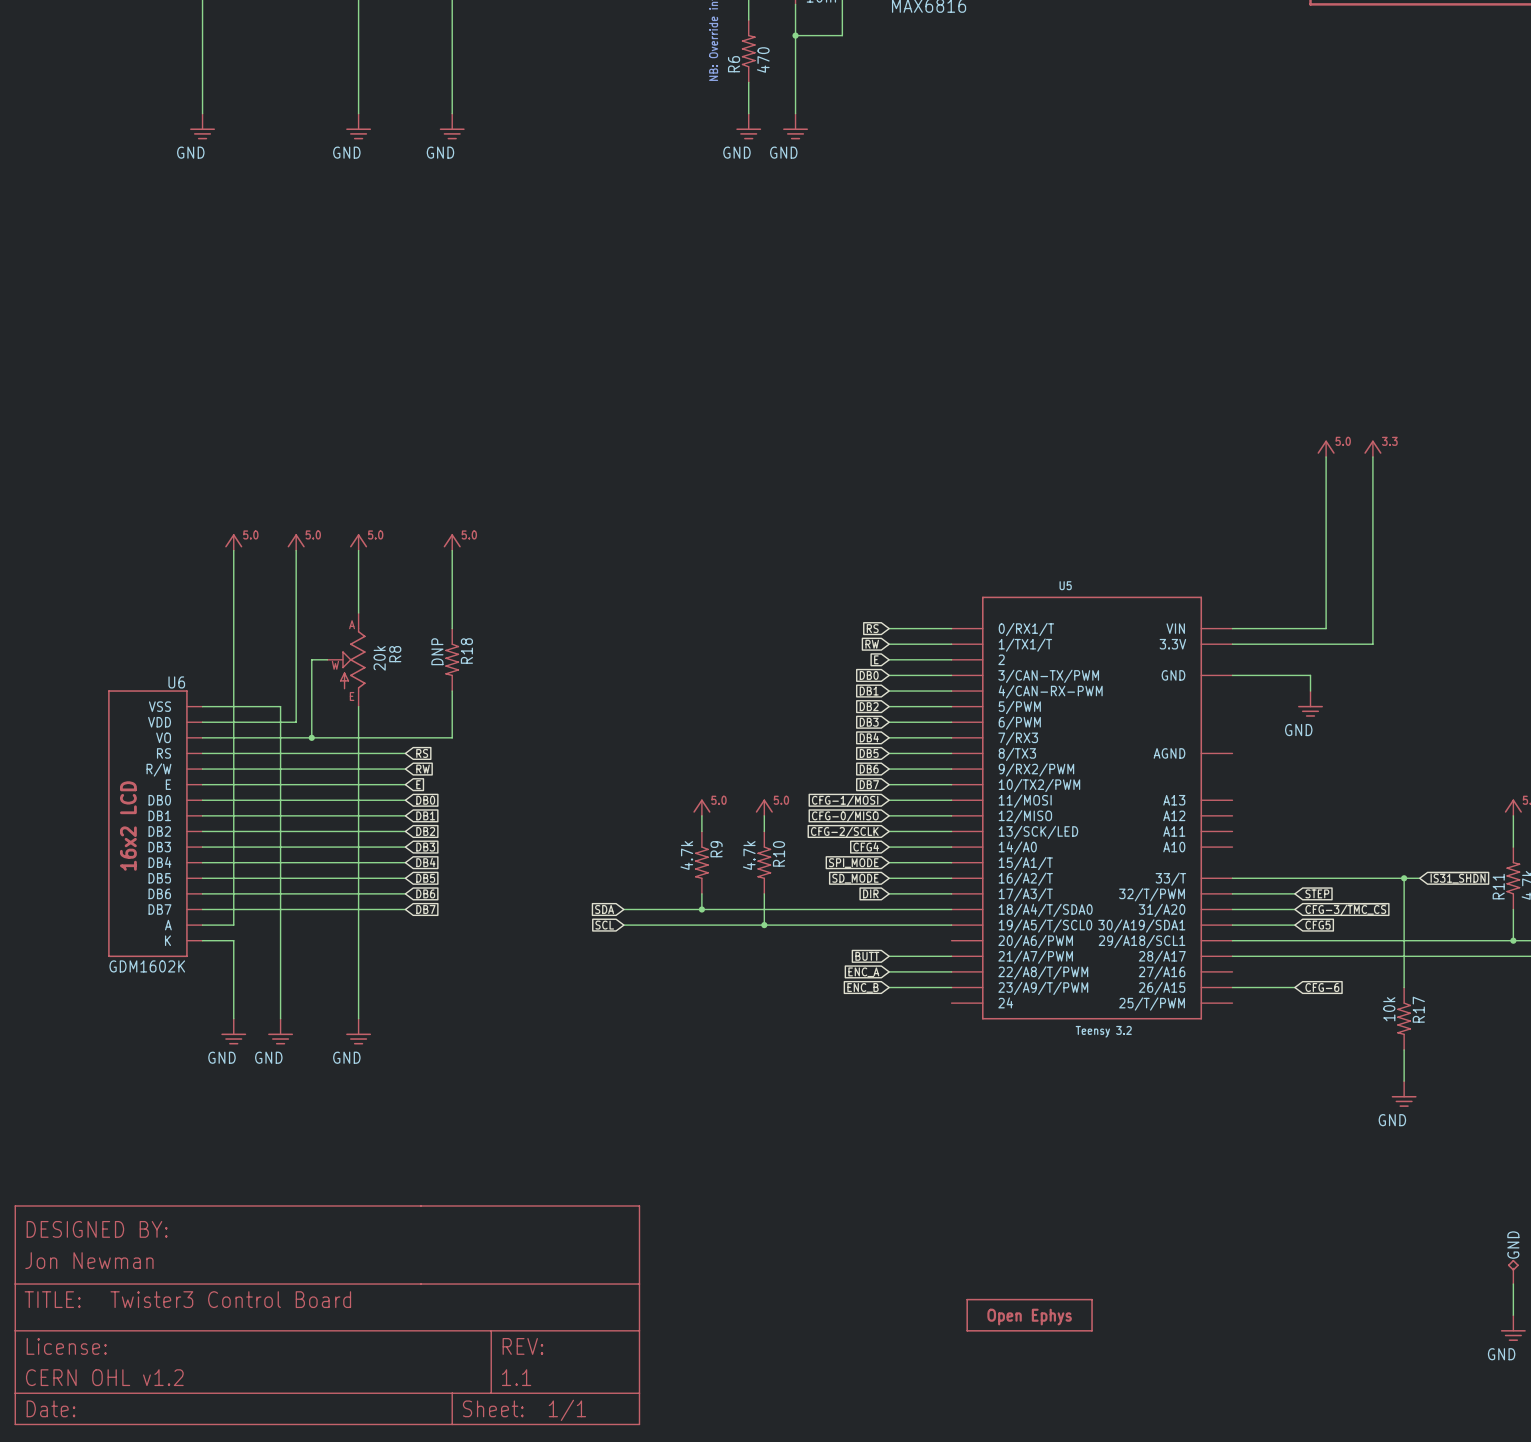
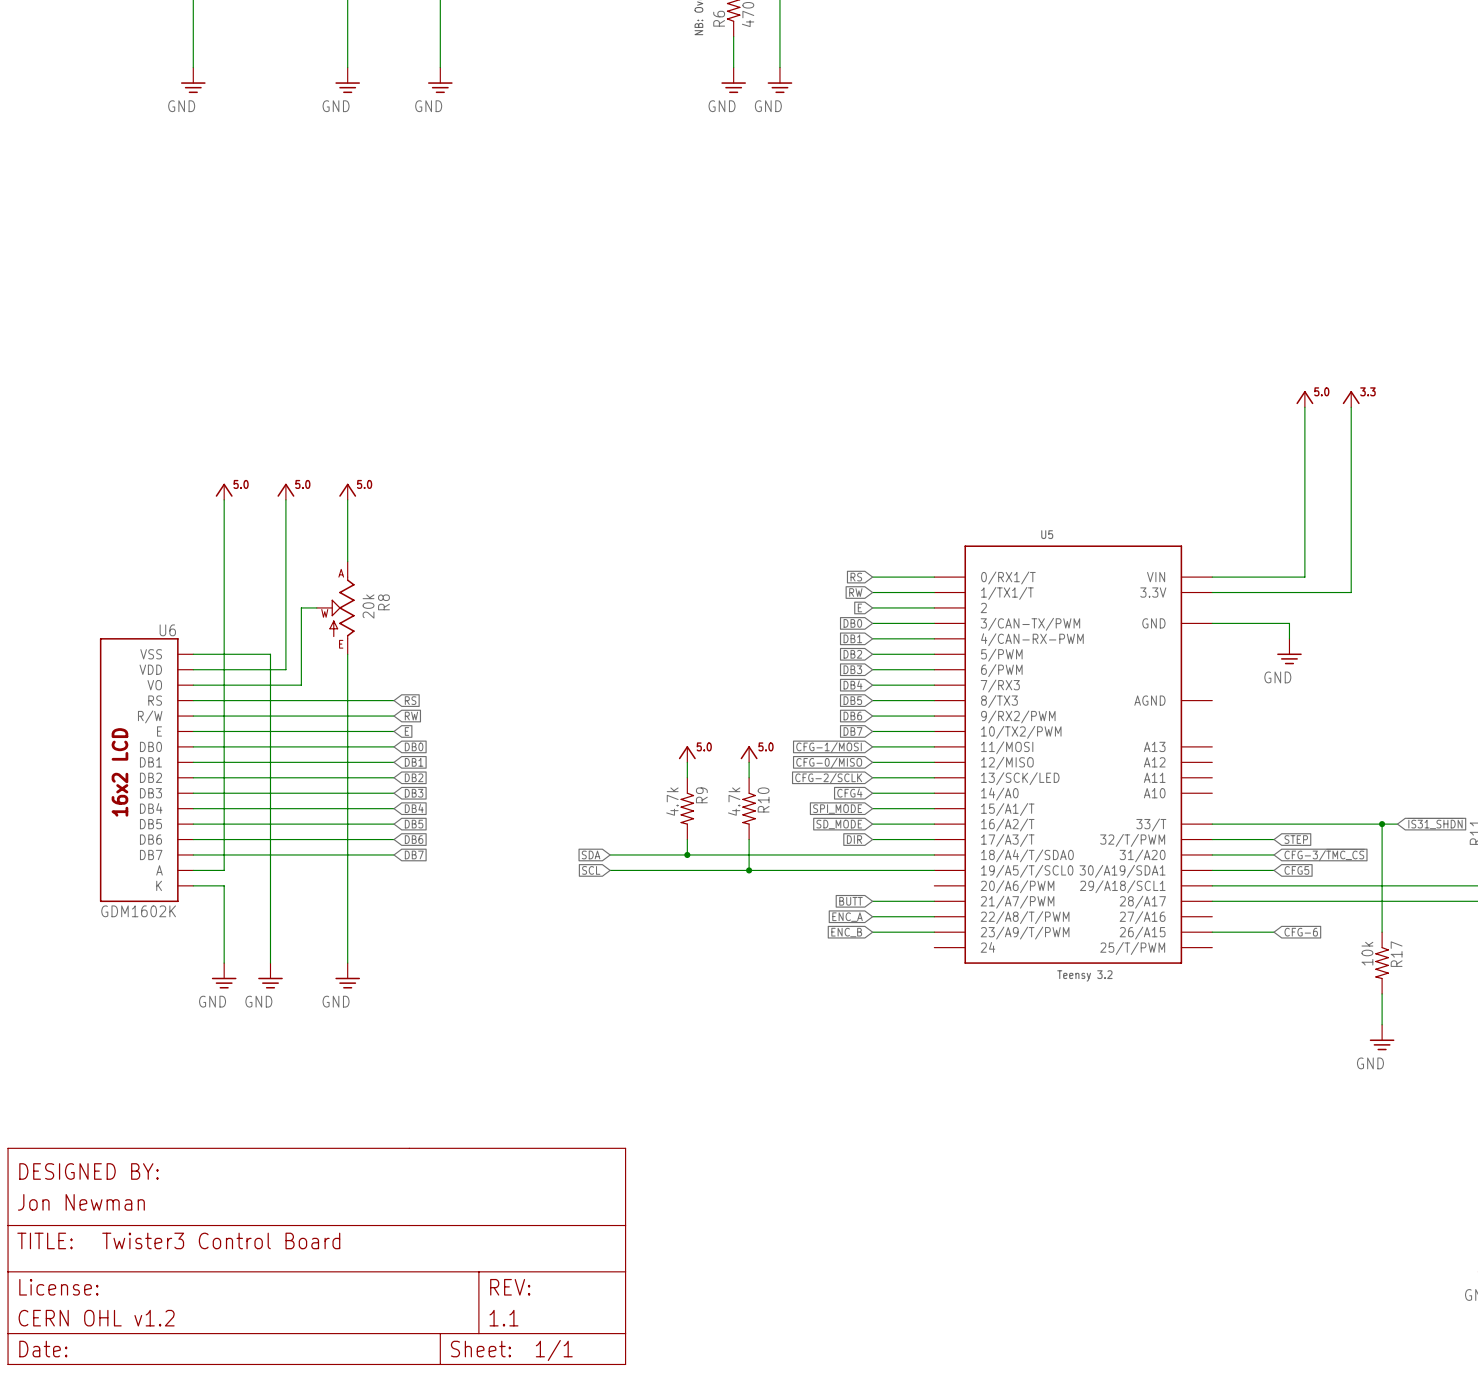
power symbol: (452, 542) -> none
wire: (452, 550) (452, 628) -> none
R18: DNP (452, 659) -> none
wire: (452, 691) (452, 737) (311, 737) -> none
junction: (311, 737) -> none
part: (1029, 1315) -> none

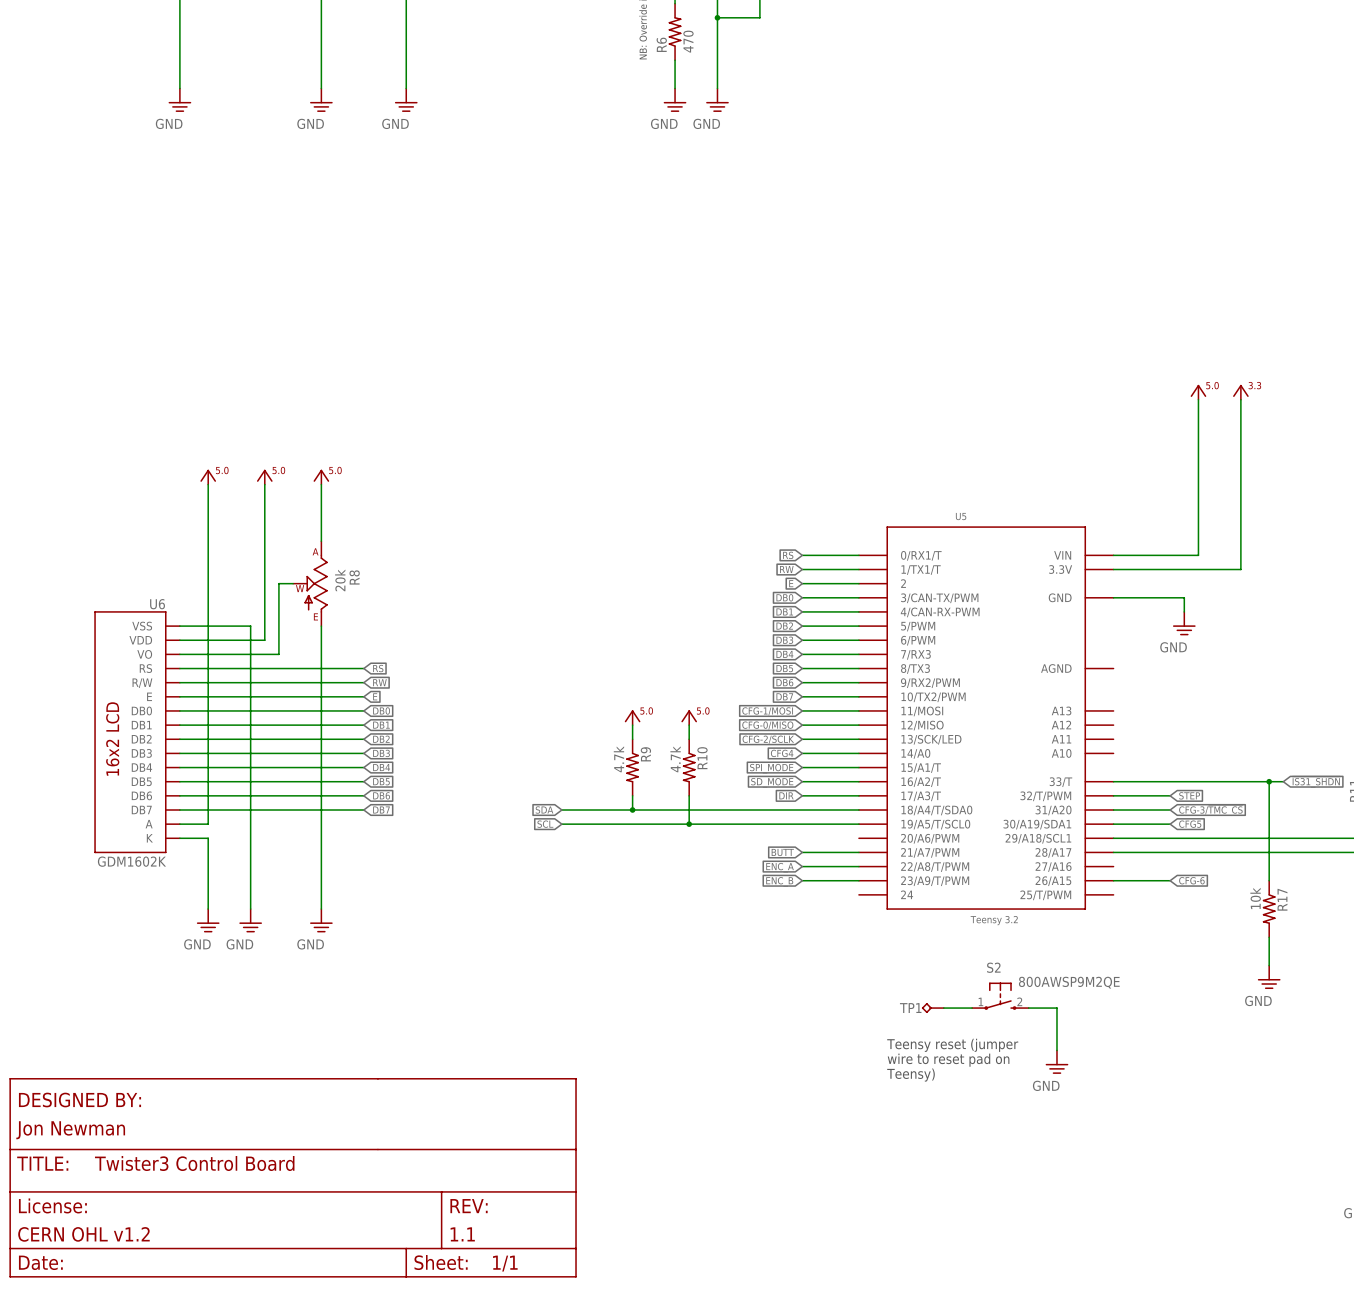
S2: none -> 800AWSP9M2QE (1000, 996)
TP1: none -> (932, 1008)
wire: none -> (943, 1008) (972, 1008)
wire: none -> (1028, 1008) (1056, 1008) (1056, 1050)
text: none -> Teensy reset (jumper (952, 1045)
text: none -> wire to reset pad on (948, 1060)
power symbol: none -> GND (1056, 1062)
text: none -> Teensy) (911, 1075)

